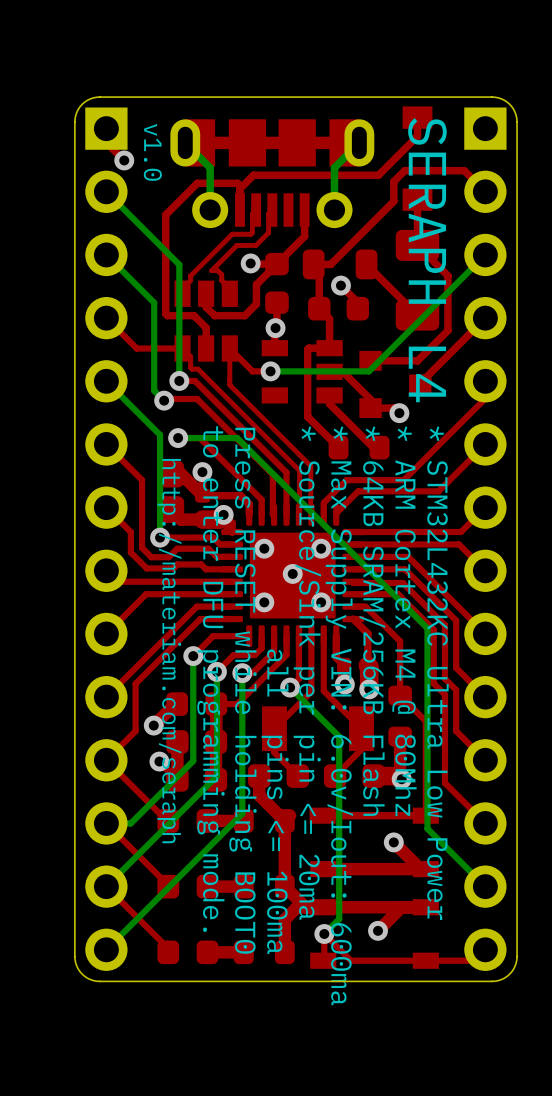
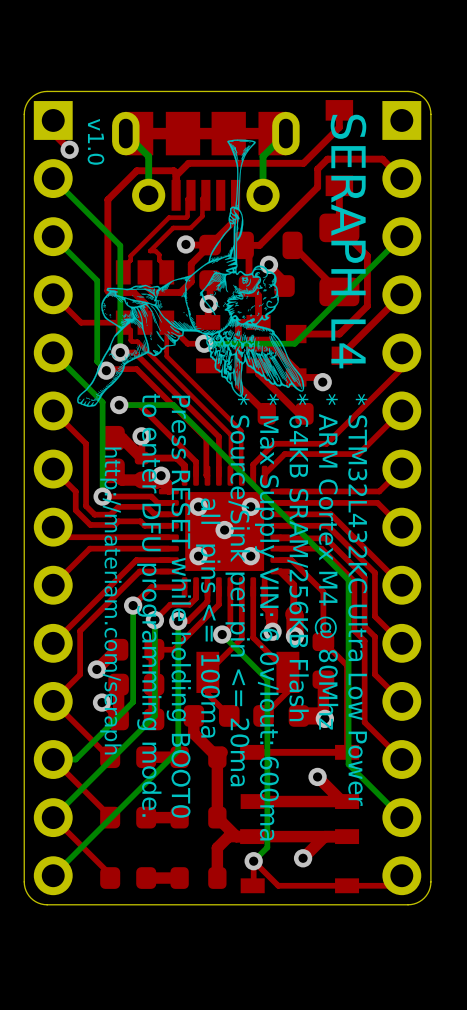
drawing: none -> [77, 139, 305, 407]

